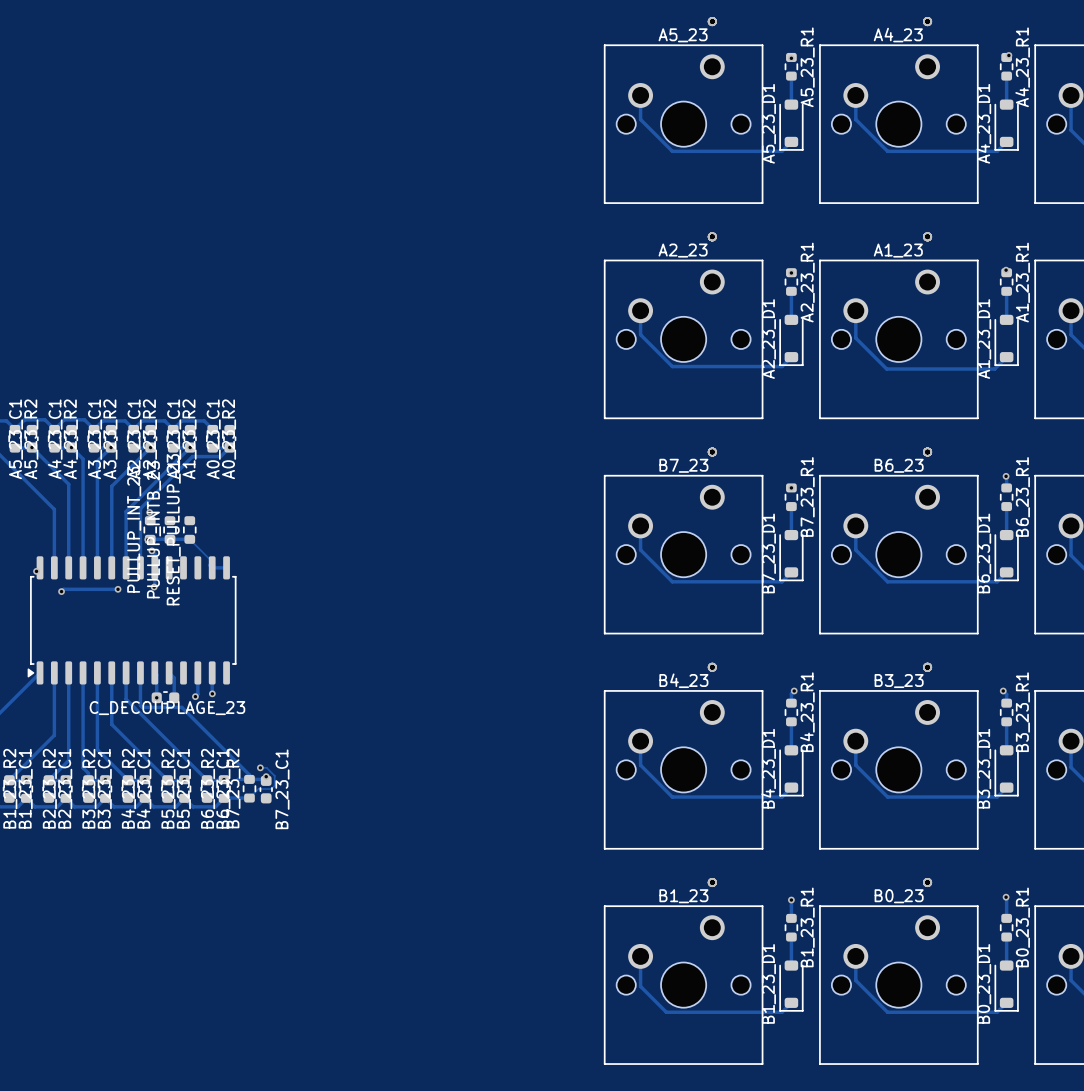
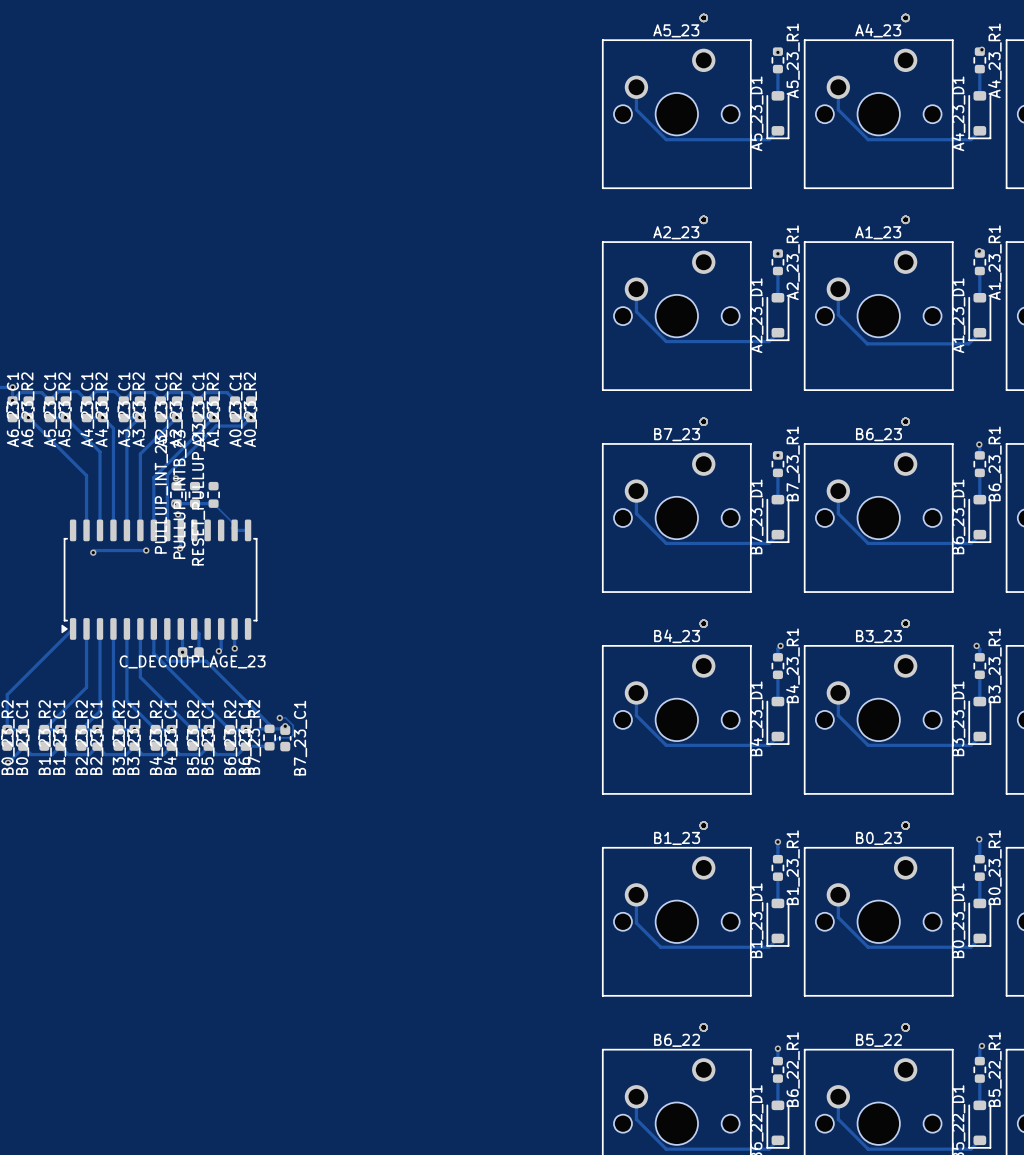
via: (36, 571) -> none

